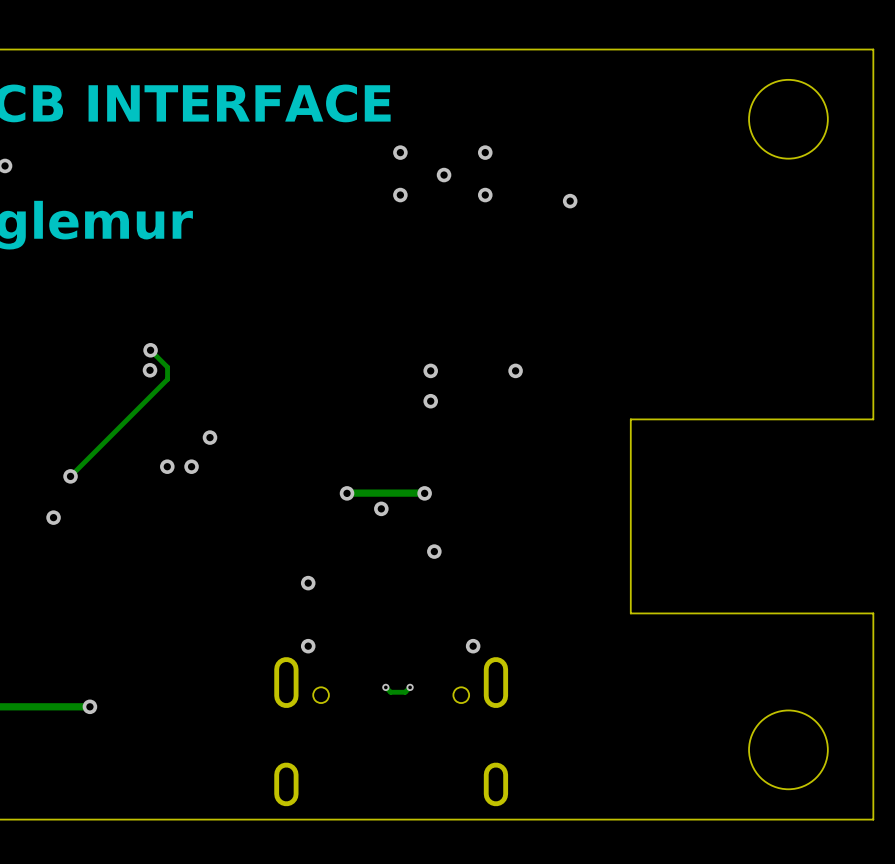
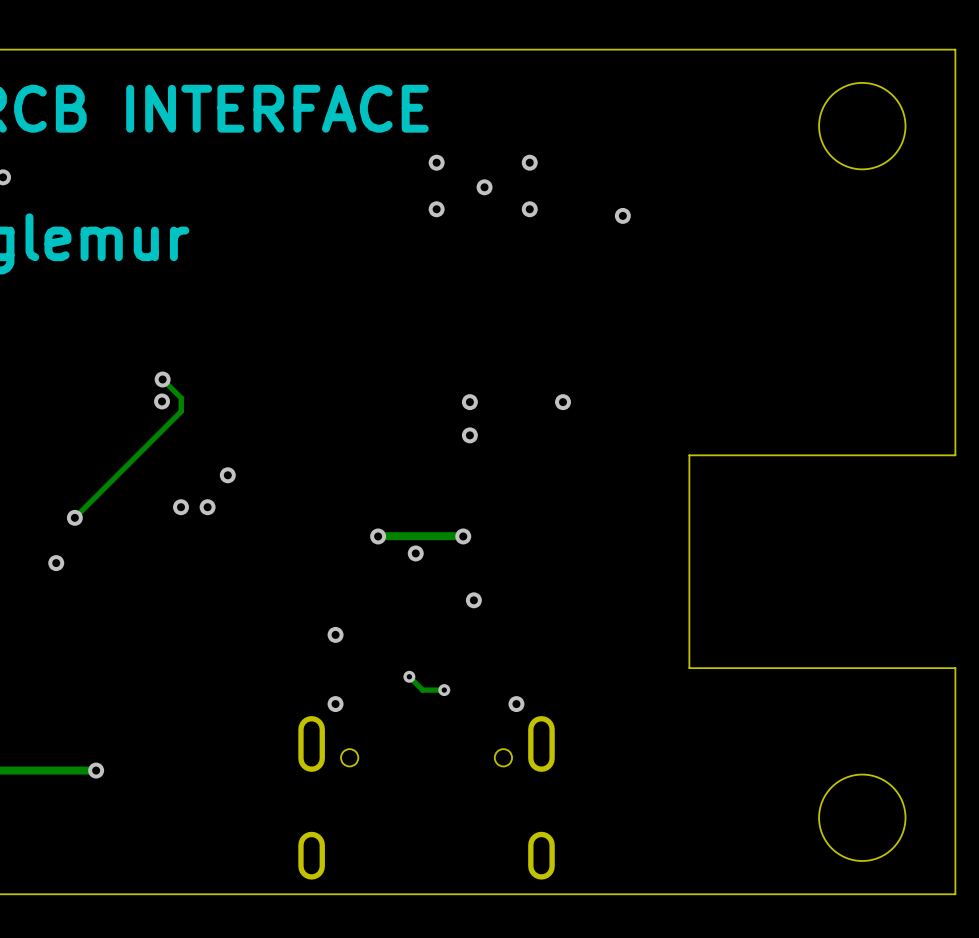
track: none -> (409, 676) (422, 690) (444, 690)
via: none -> (409, 676)
via: none -> (444, 690)
via: (385, 687) -> none
track: (410, 687) (405, 692) (390, 692) (385, 687) -> none
via: (410, 687) -> none

